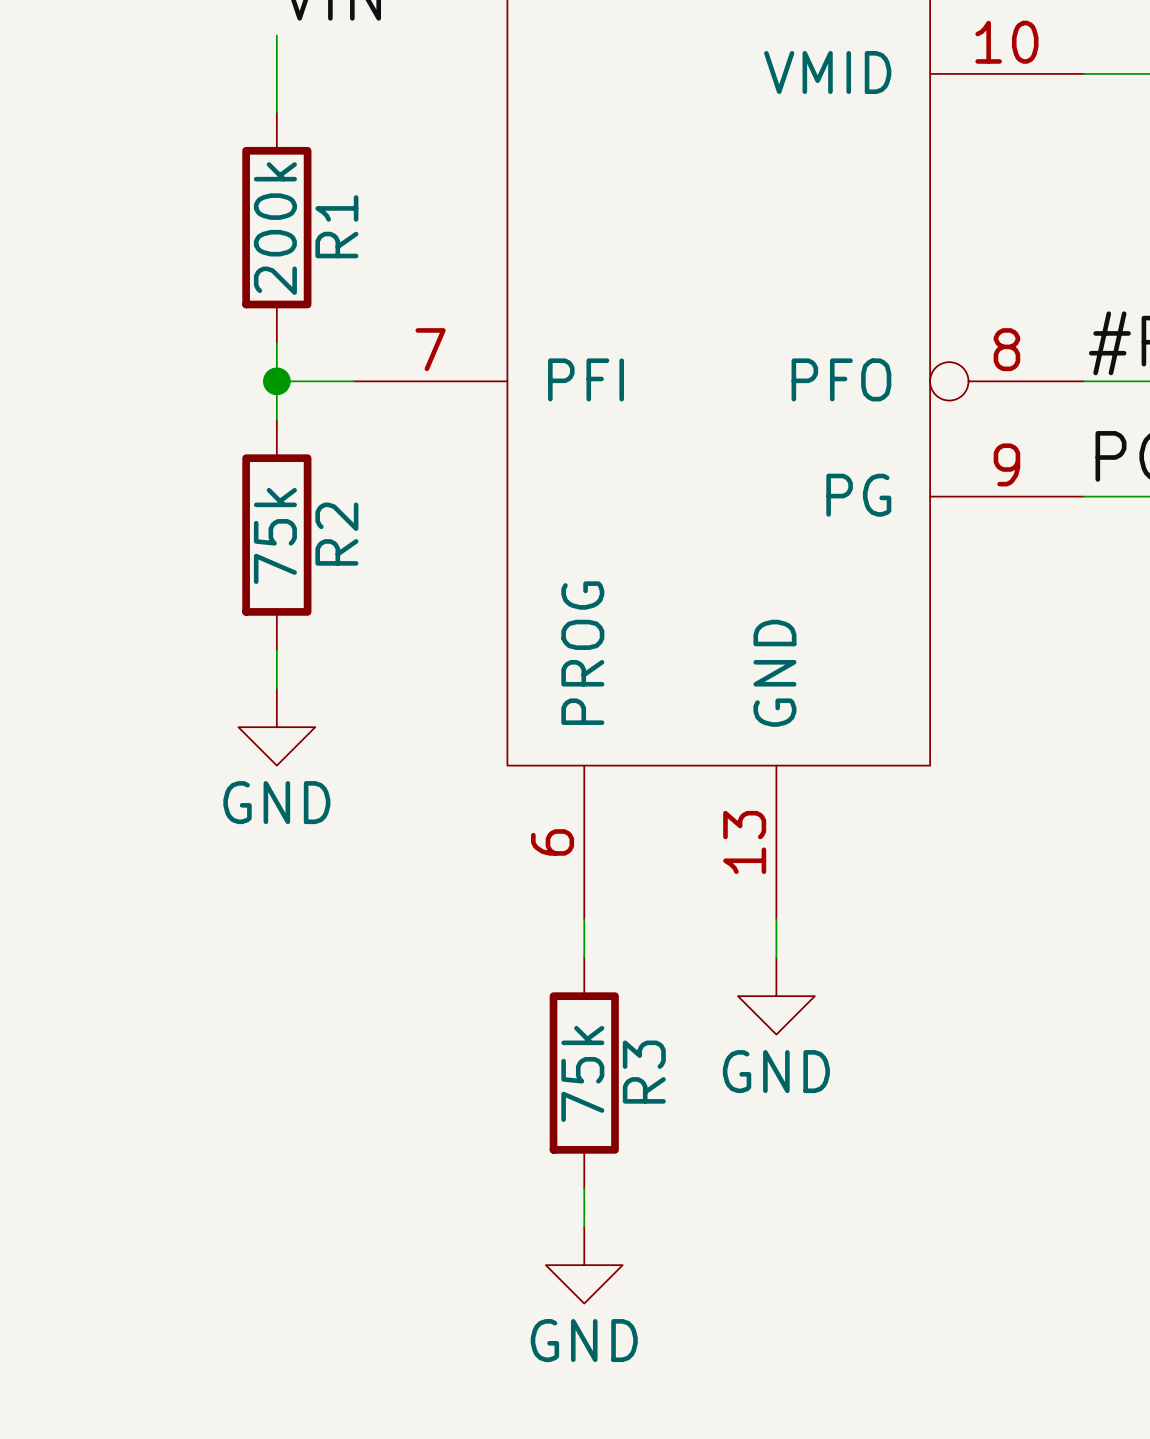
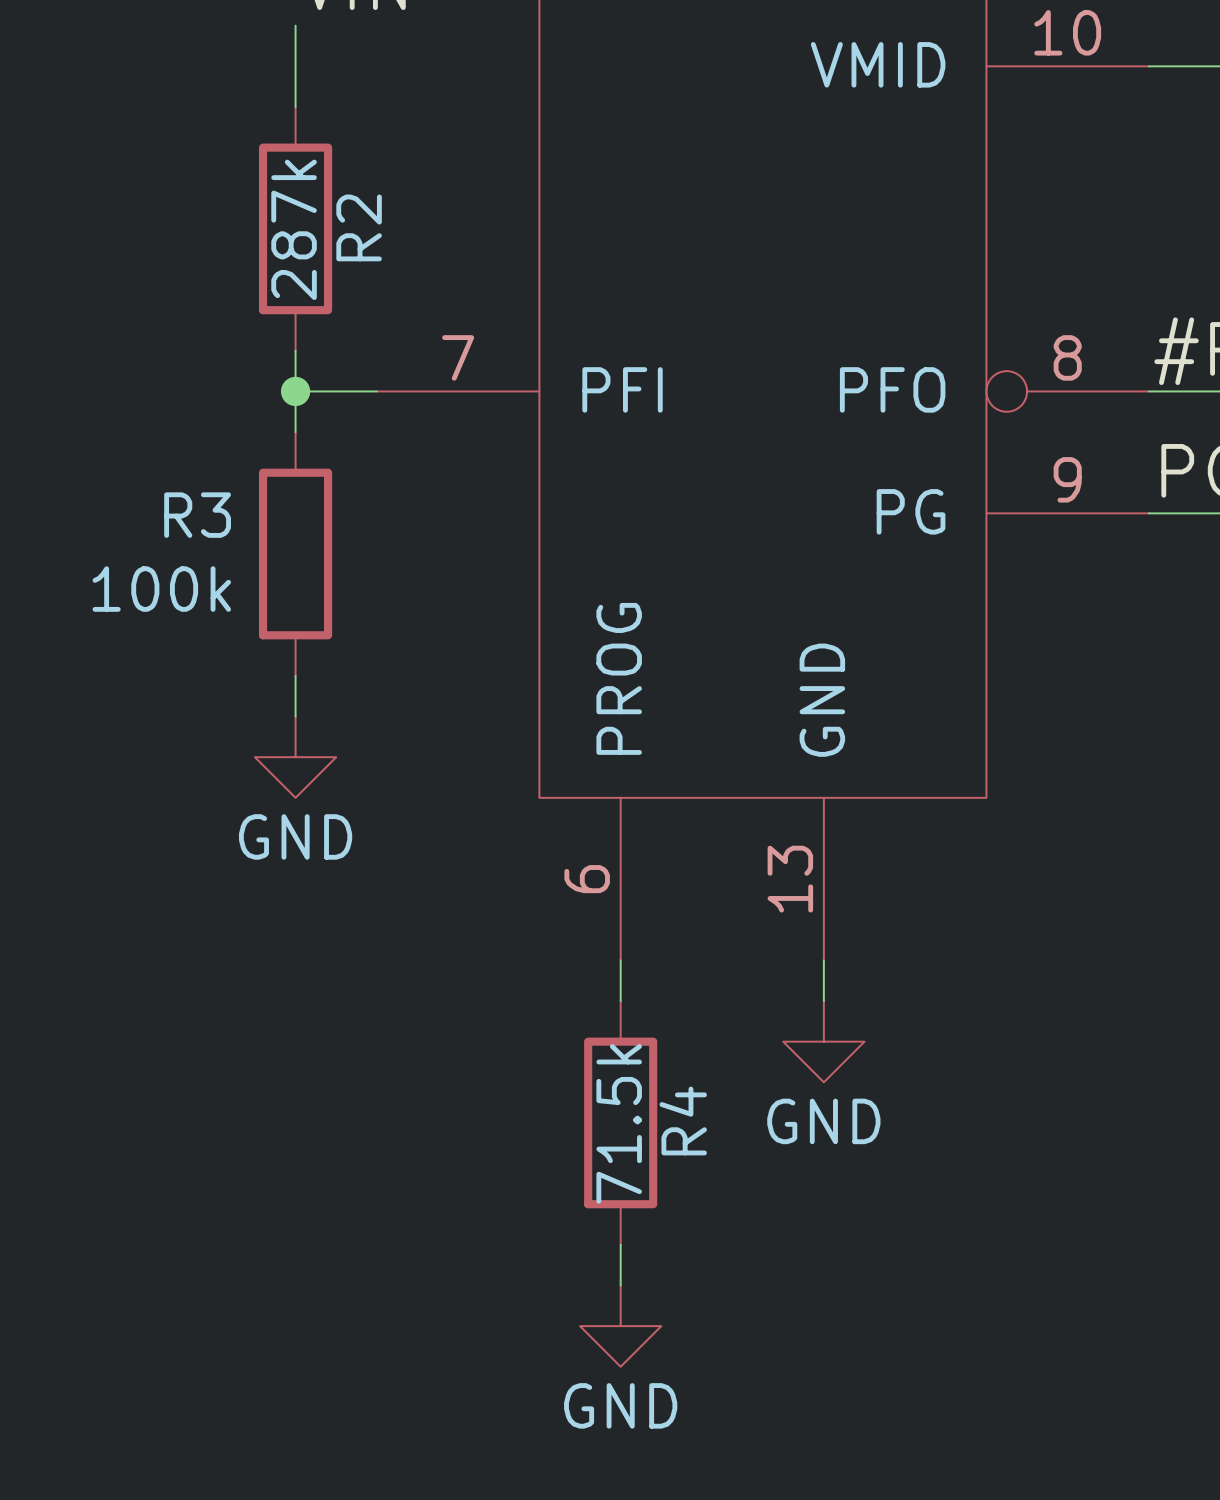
R1 name: R1 (336, 226) -> R2 (359, 227)
R1 value: 200k (275, 228) -> 287k (294, 229)
R2 name: R2 (336, 534) -> R3 (197, 515)
R2 value: 75k (275, 535) -> 100k (161, 589)
R3 name: R3 (644, 1072) -> R4 (683, 1121)
R3 value: 75k (582, 1073) -> 71.5k (619, 1123)

